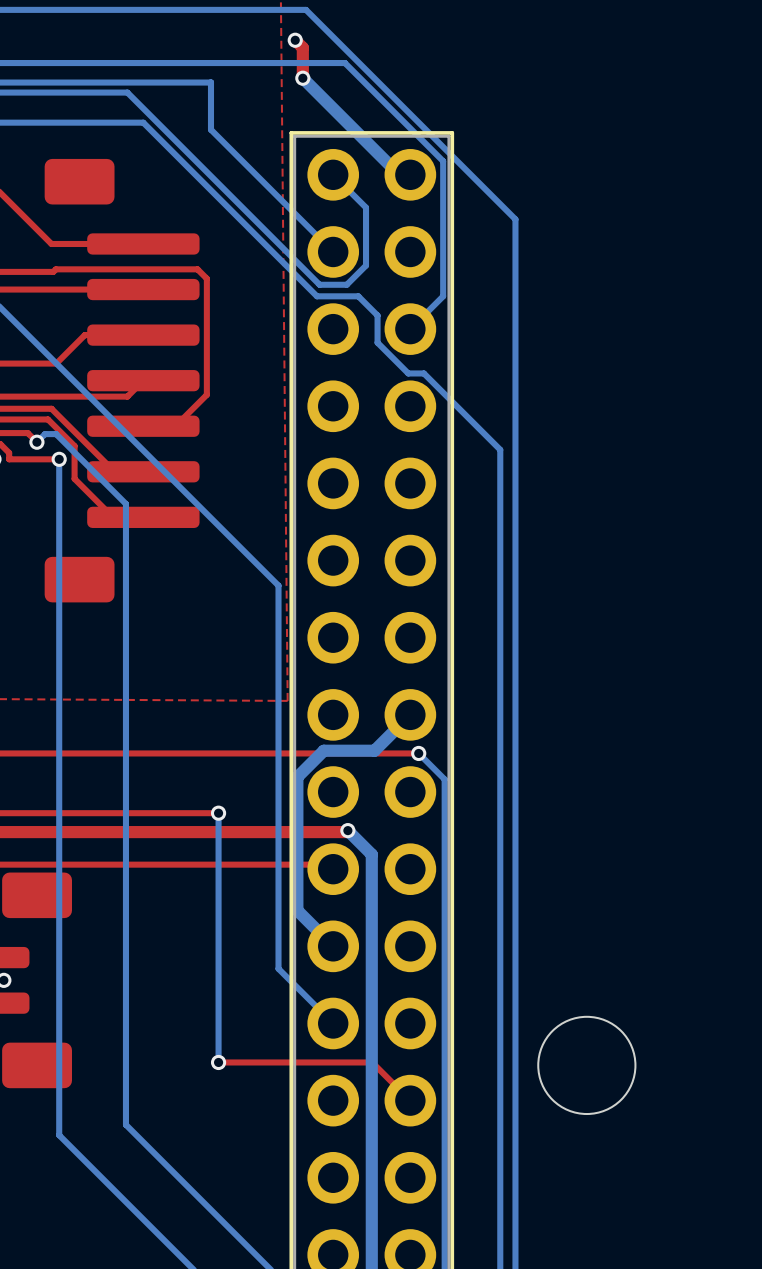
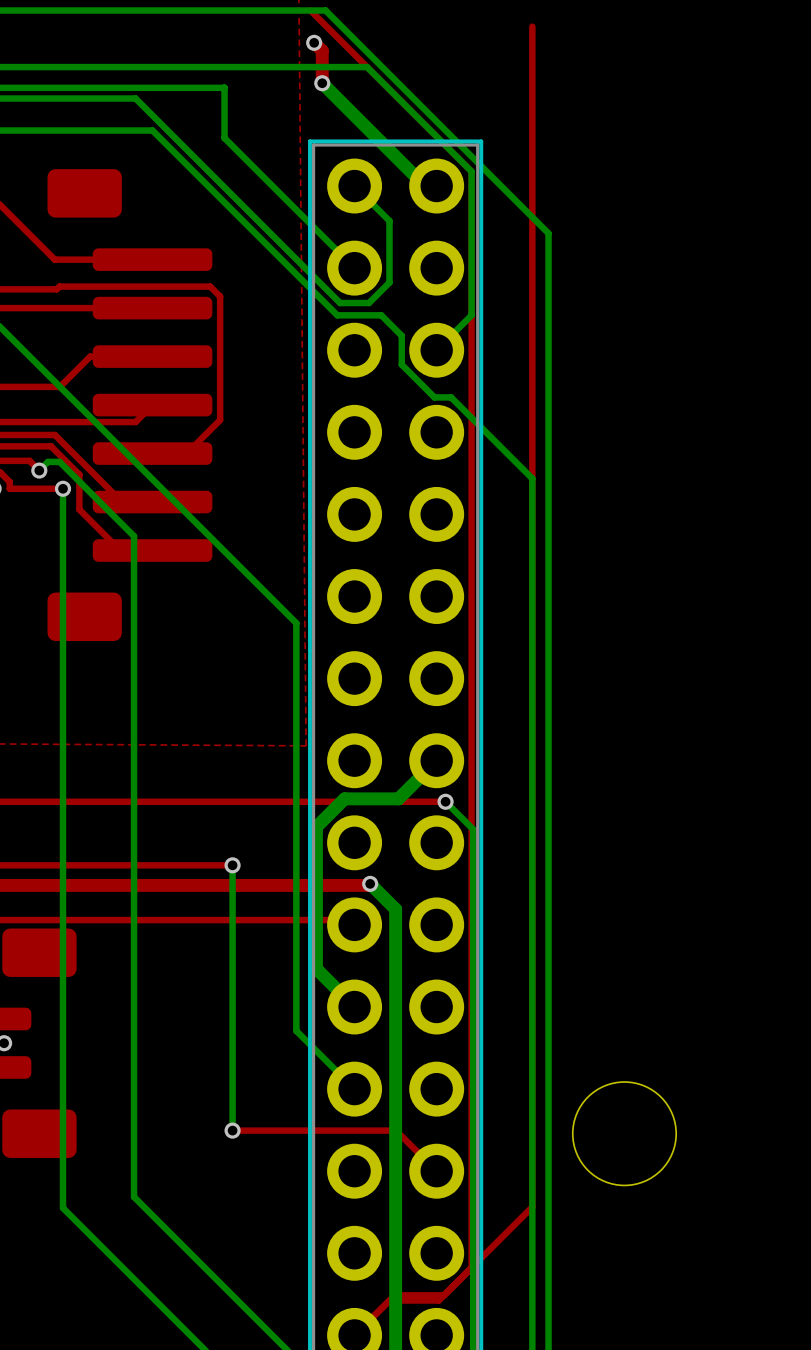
top track: none -> (310, 10) (471, 171) (471, 1267)
top track: none -> (532, 26) (532, 1207) (438, 1300) (389, 1300)
top track: none -> (444, 1295) (394, 1295) (354, 1335)

